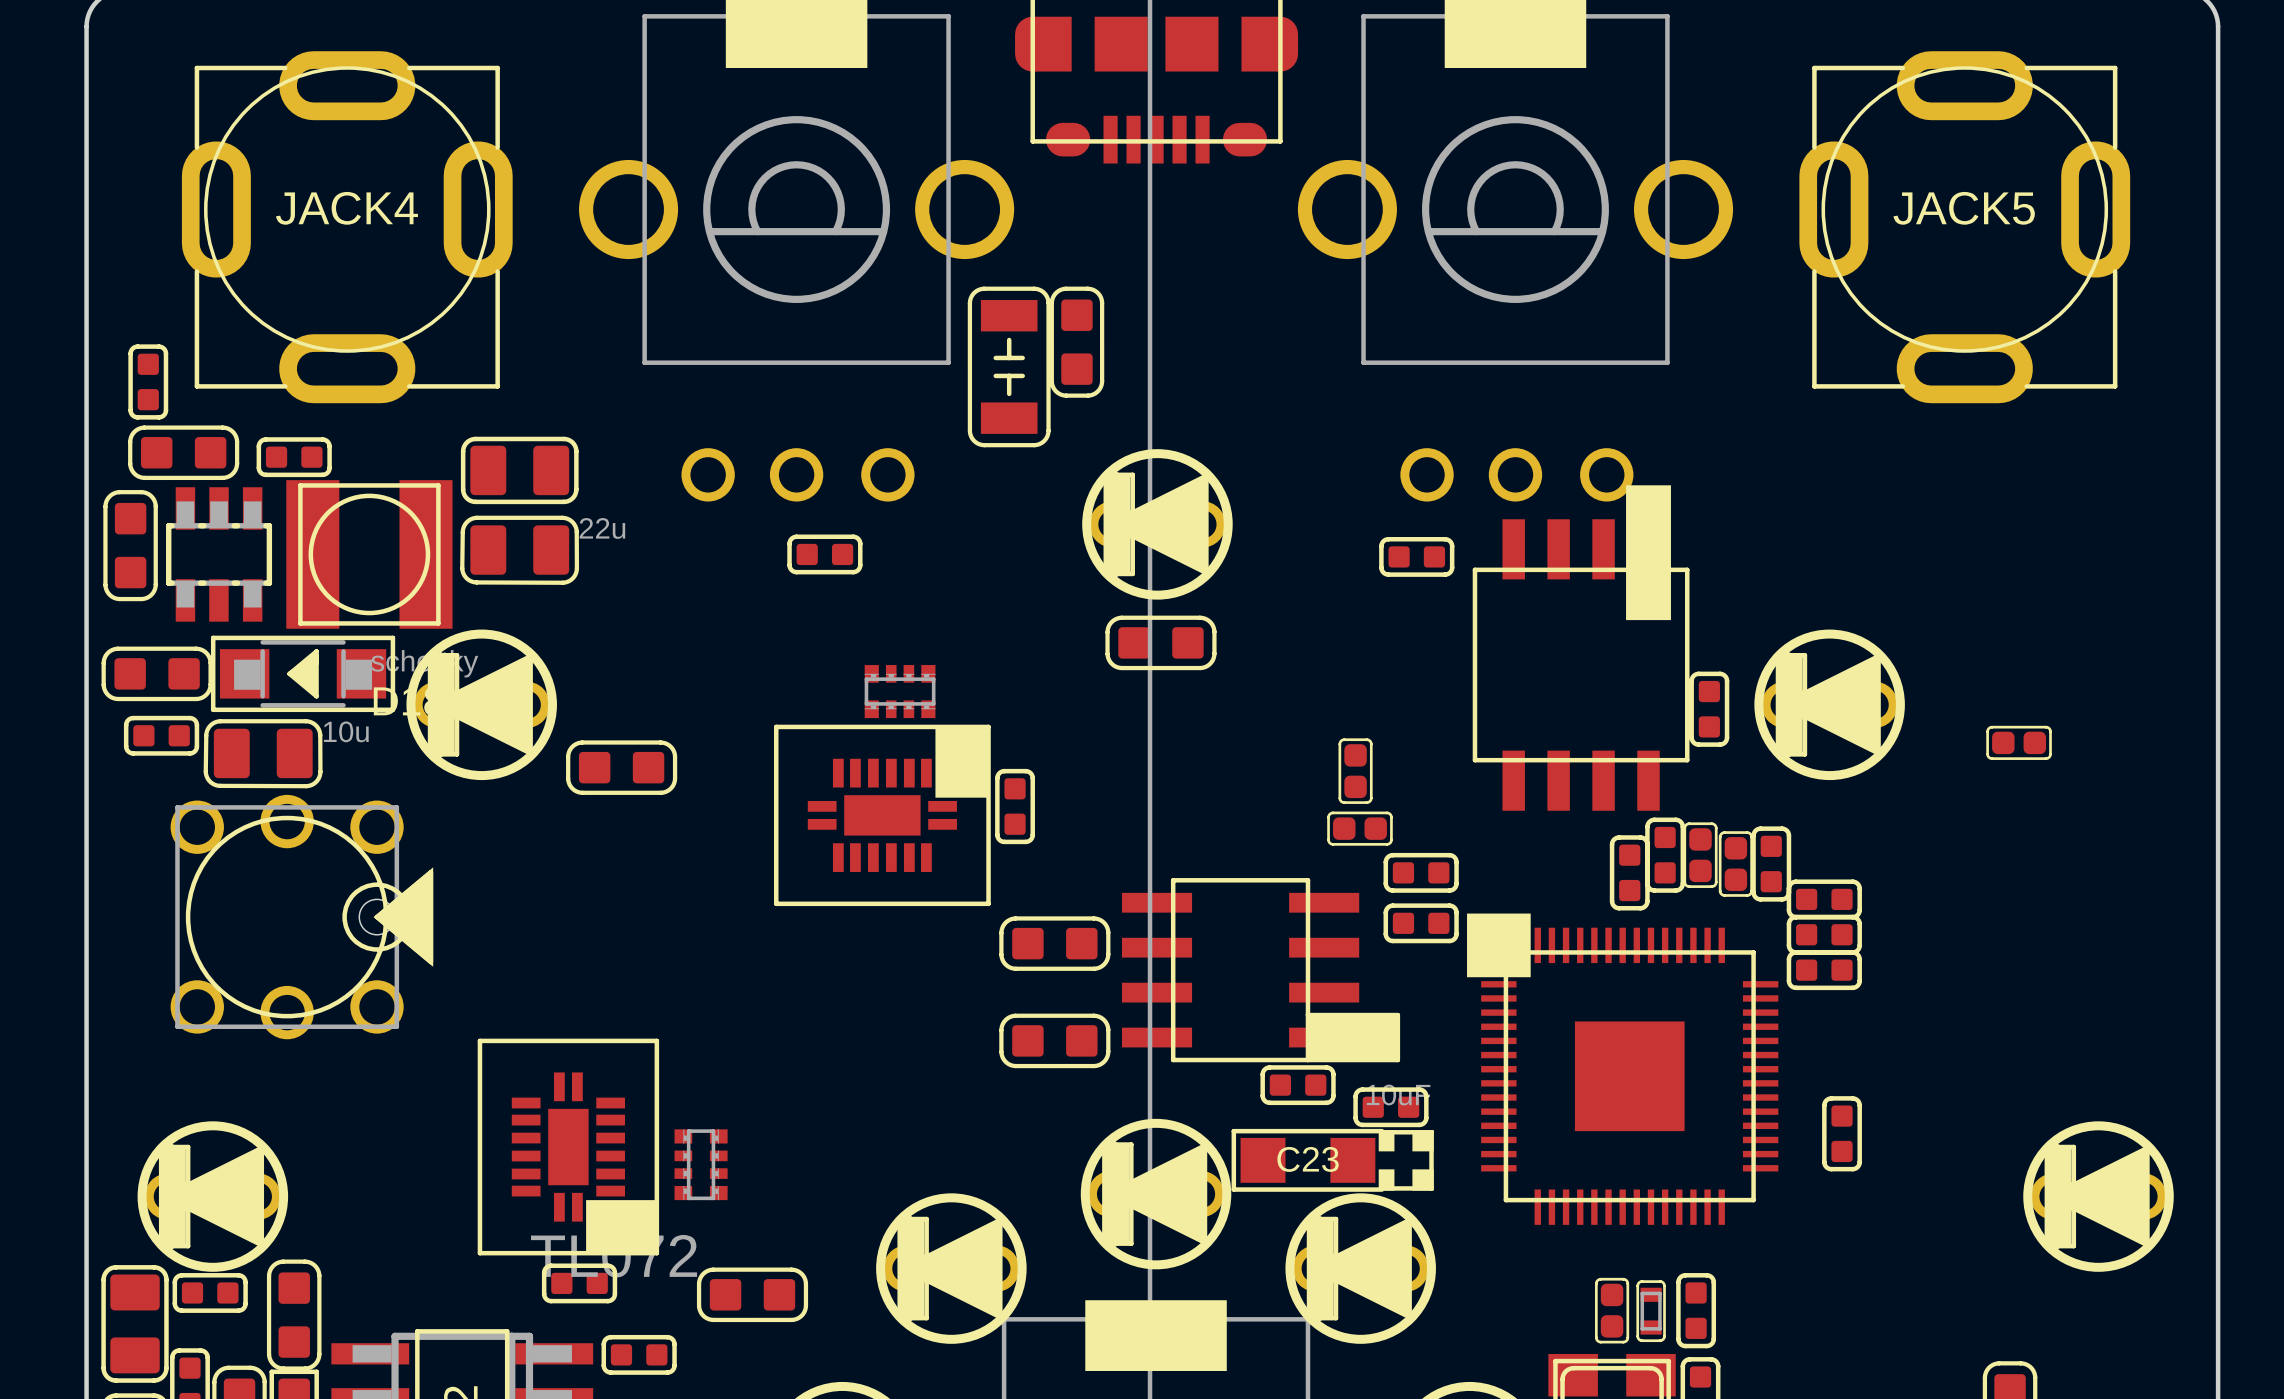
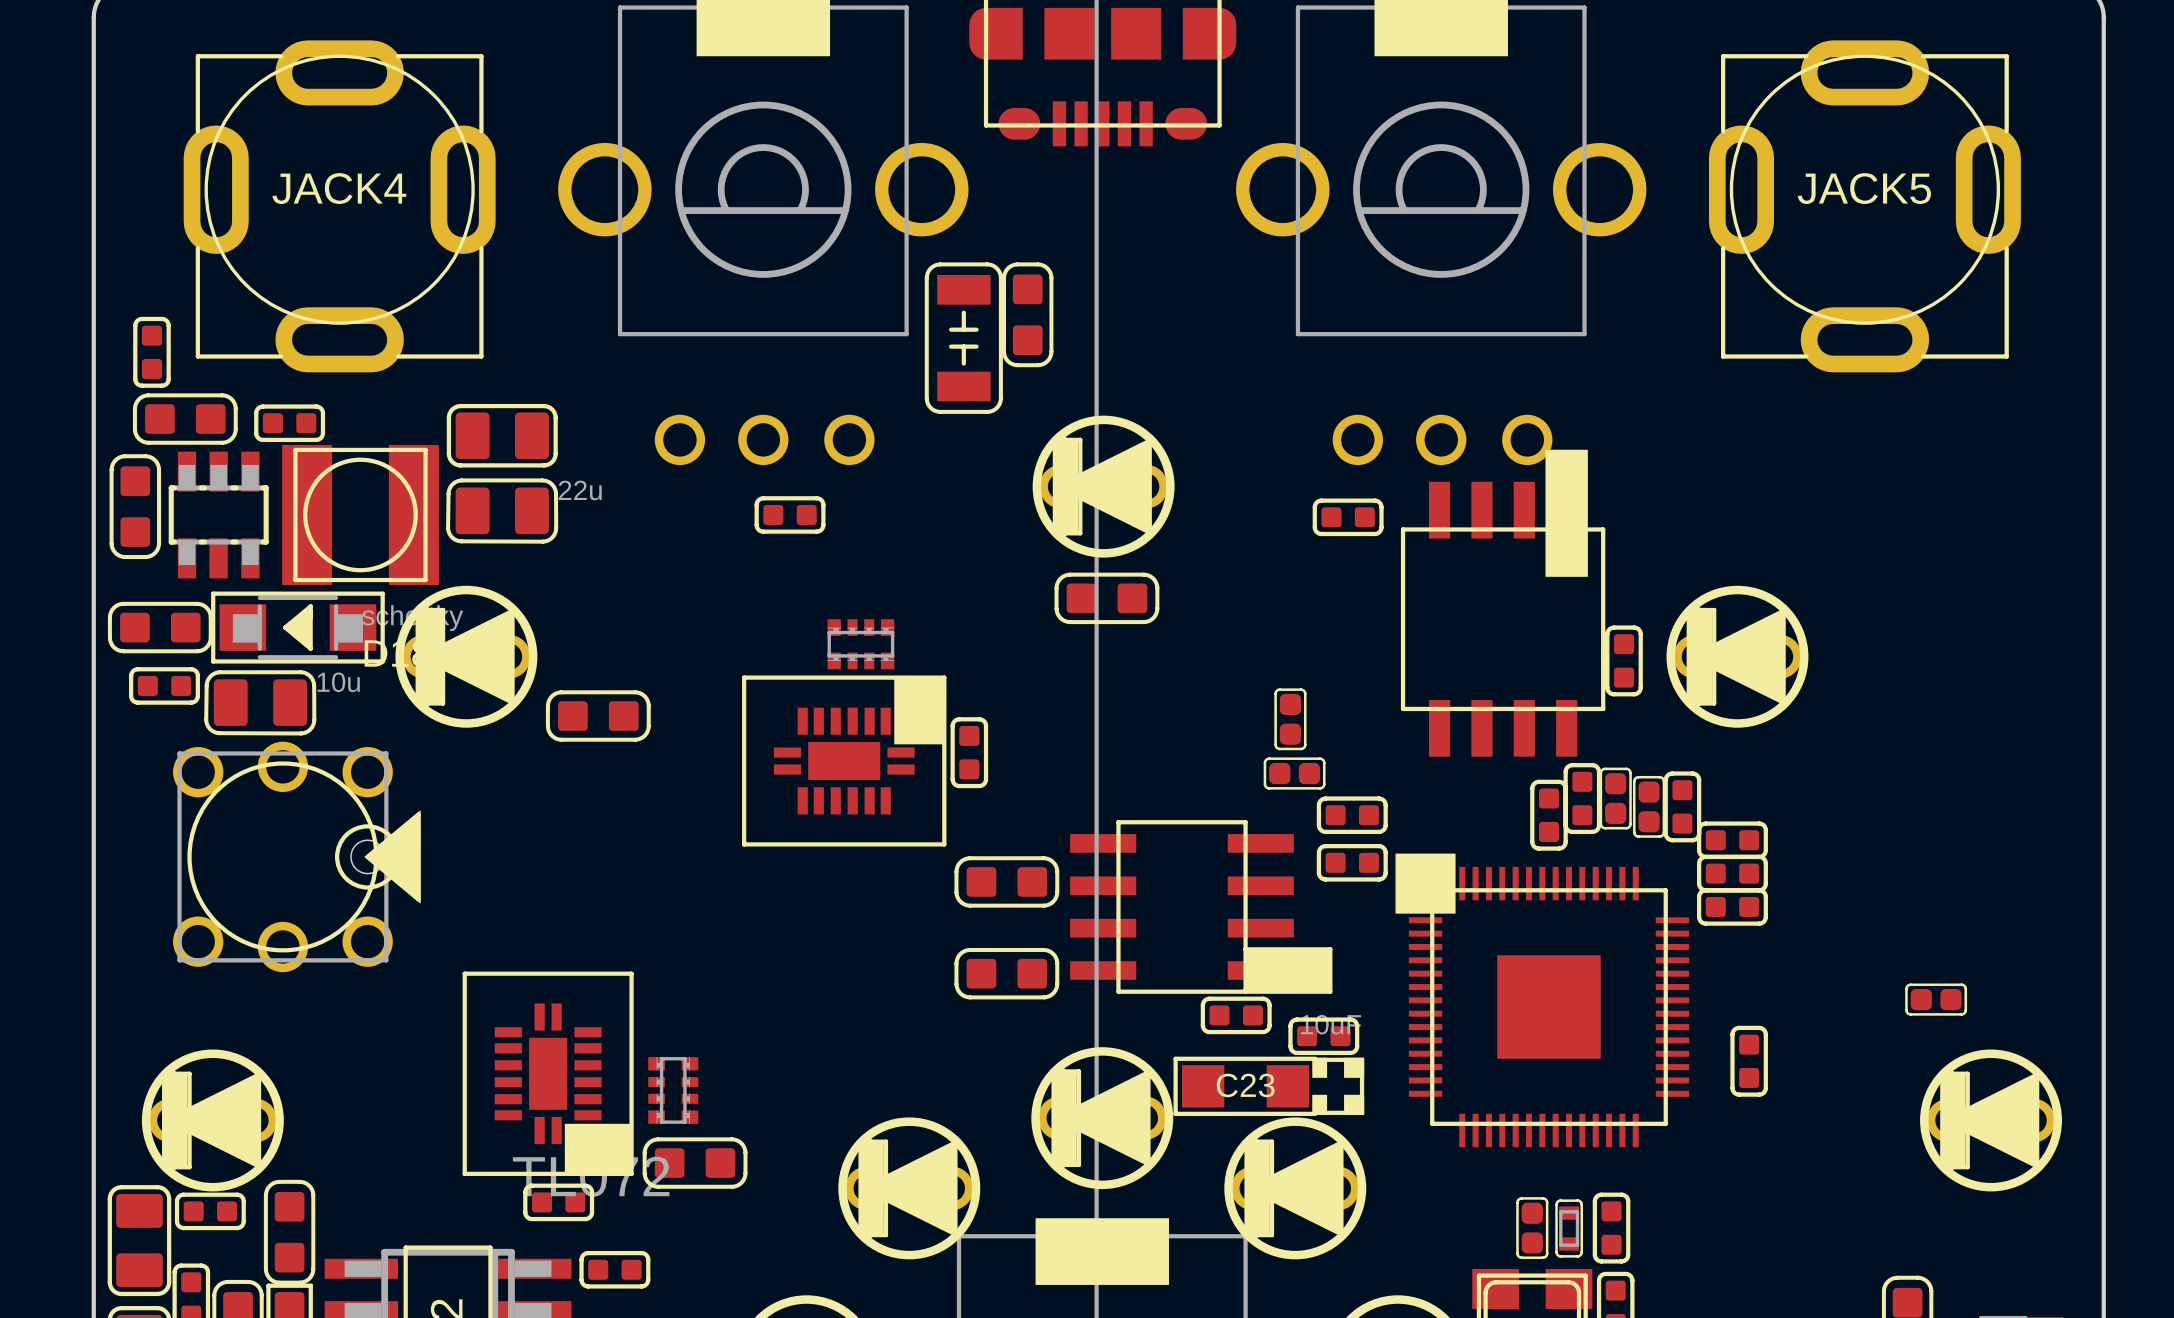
part position: (2019, 742) -> (1936, 999)
part position: (752, 1294) -> (695, 1163)

